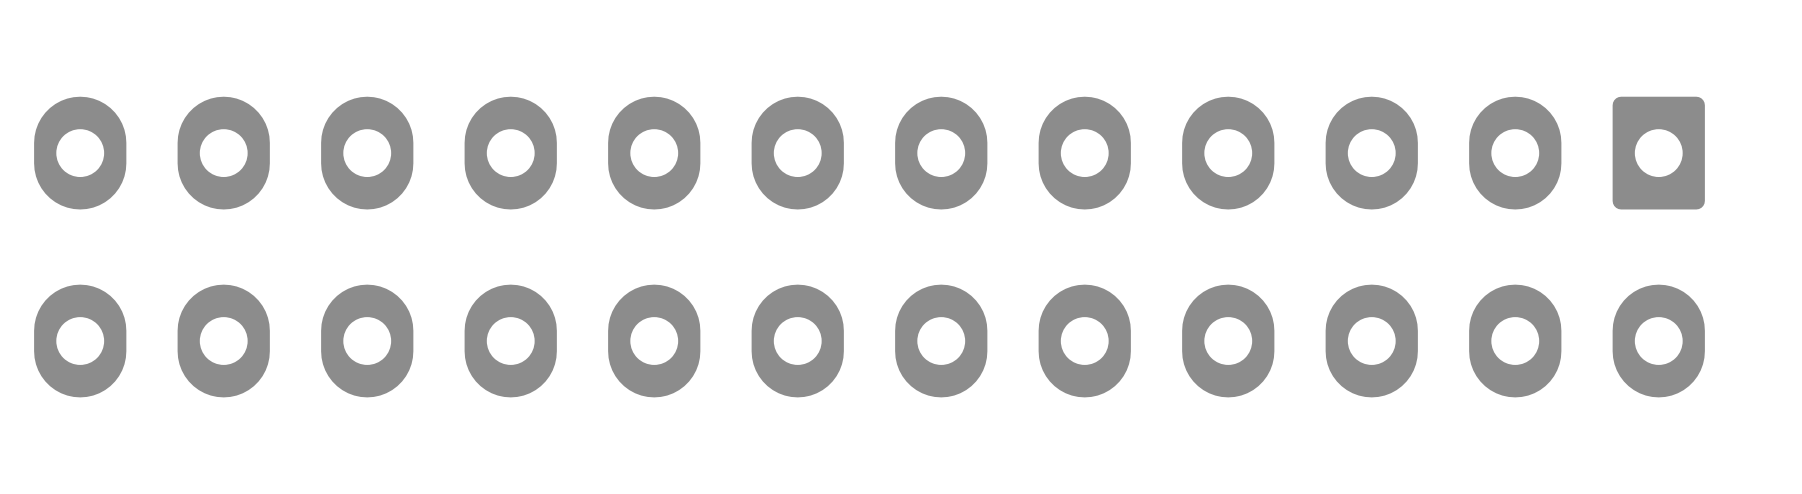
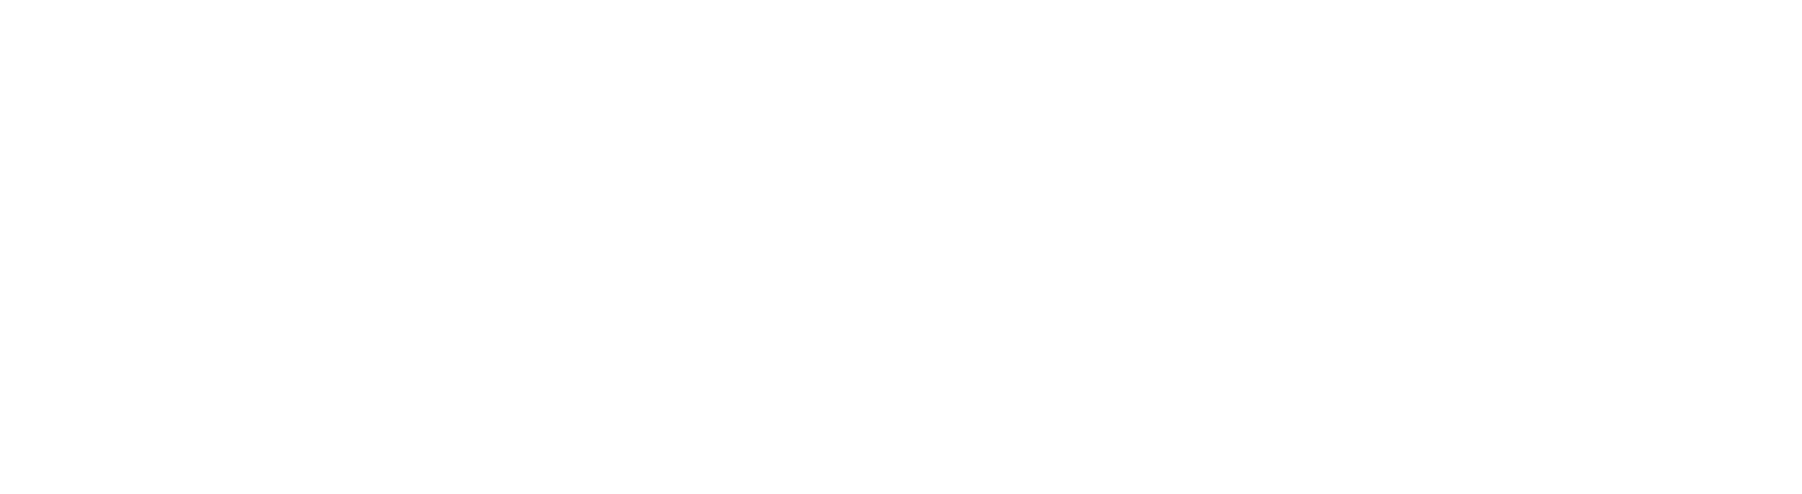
part: (869, 247) -> none

